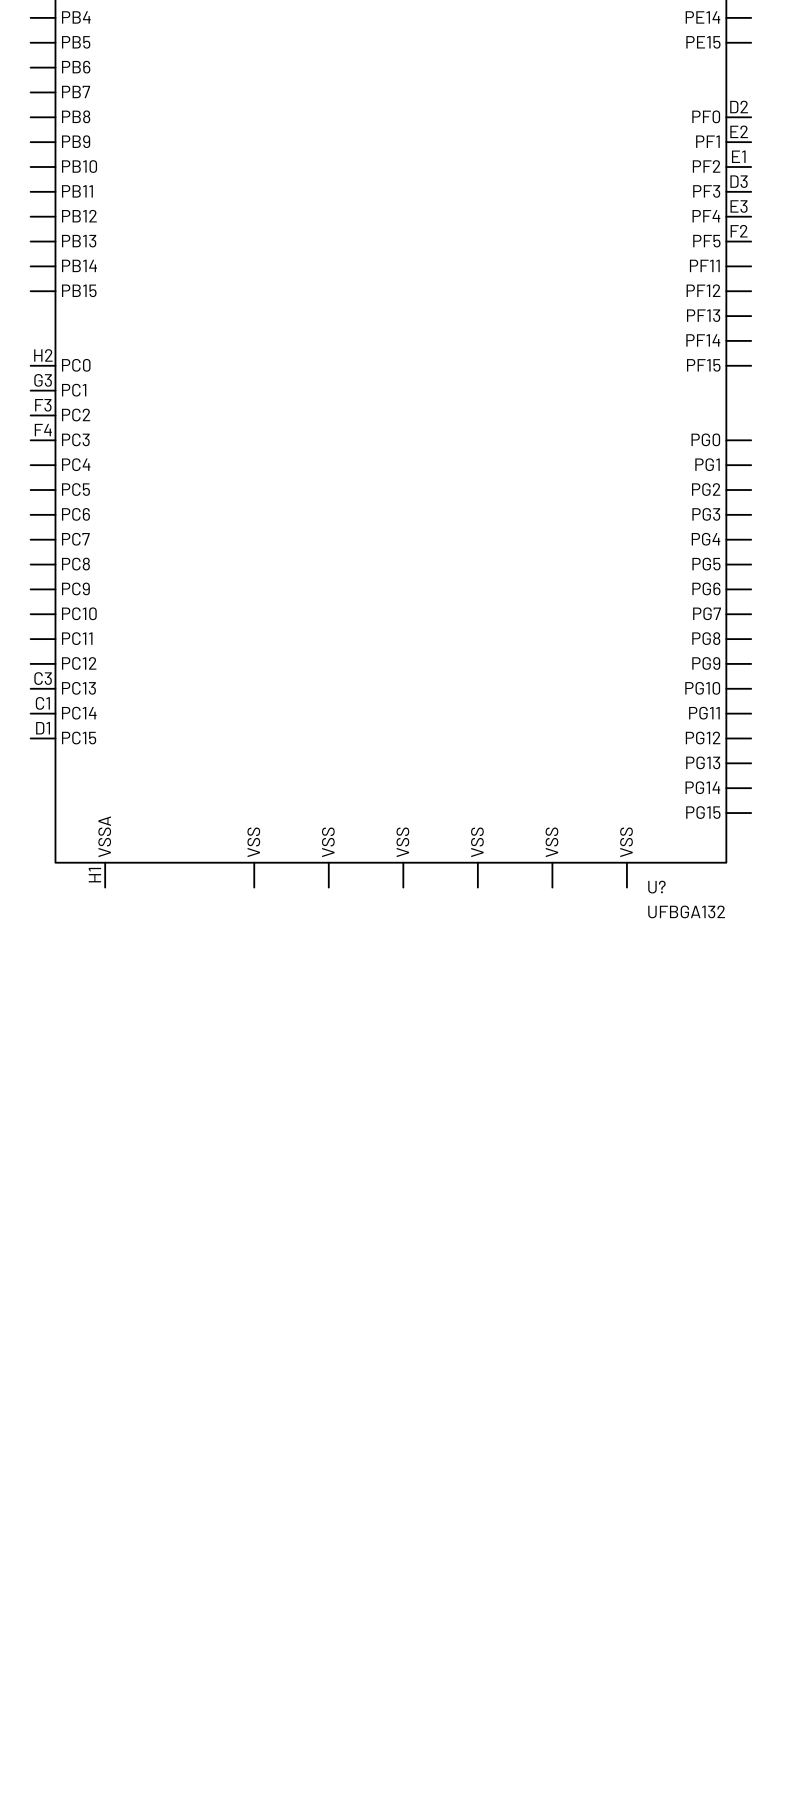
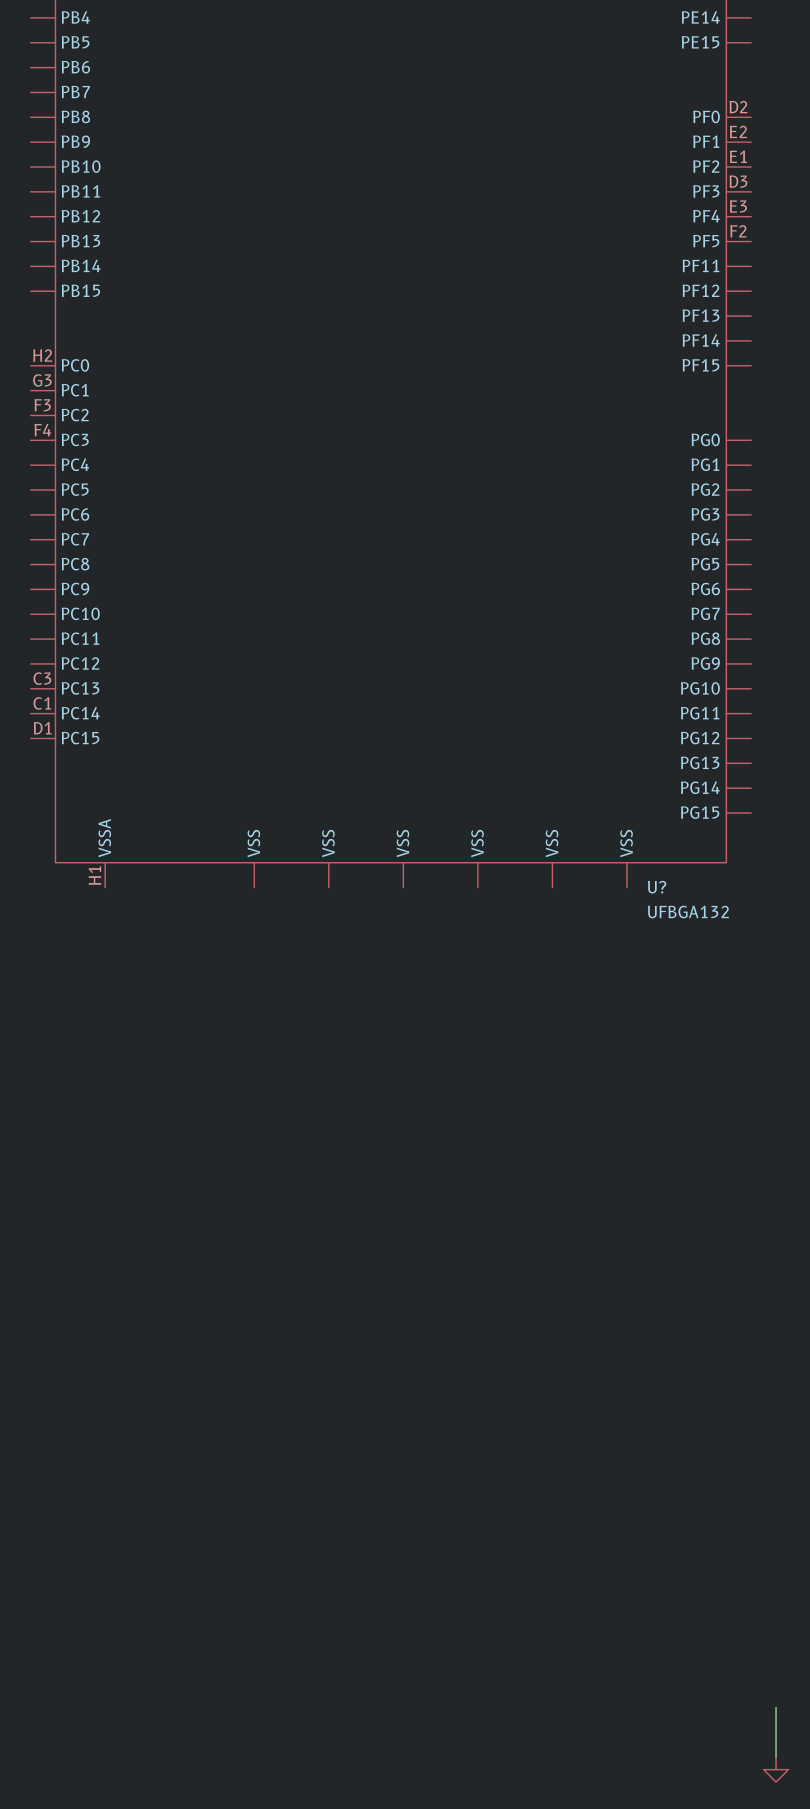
wire: none -> (776, 1707) (776, 1757)
power symbol: none -> (776, 1769)

